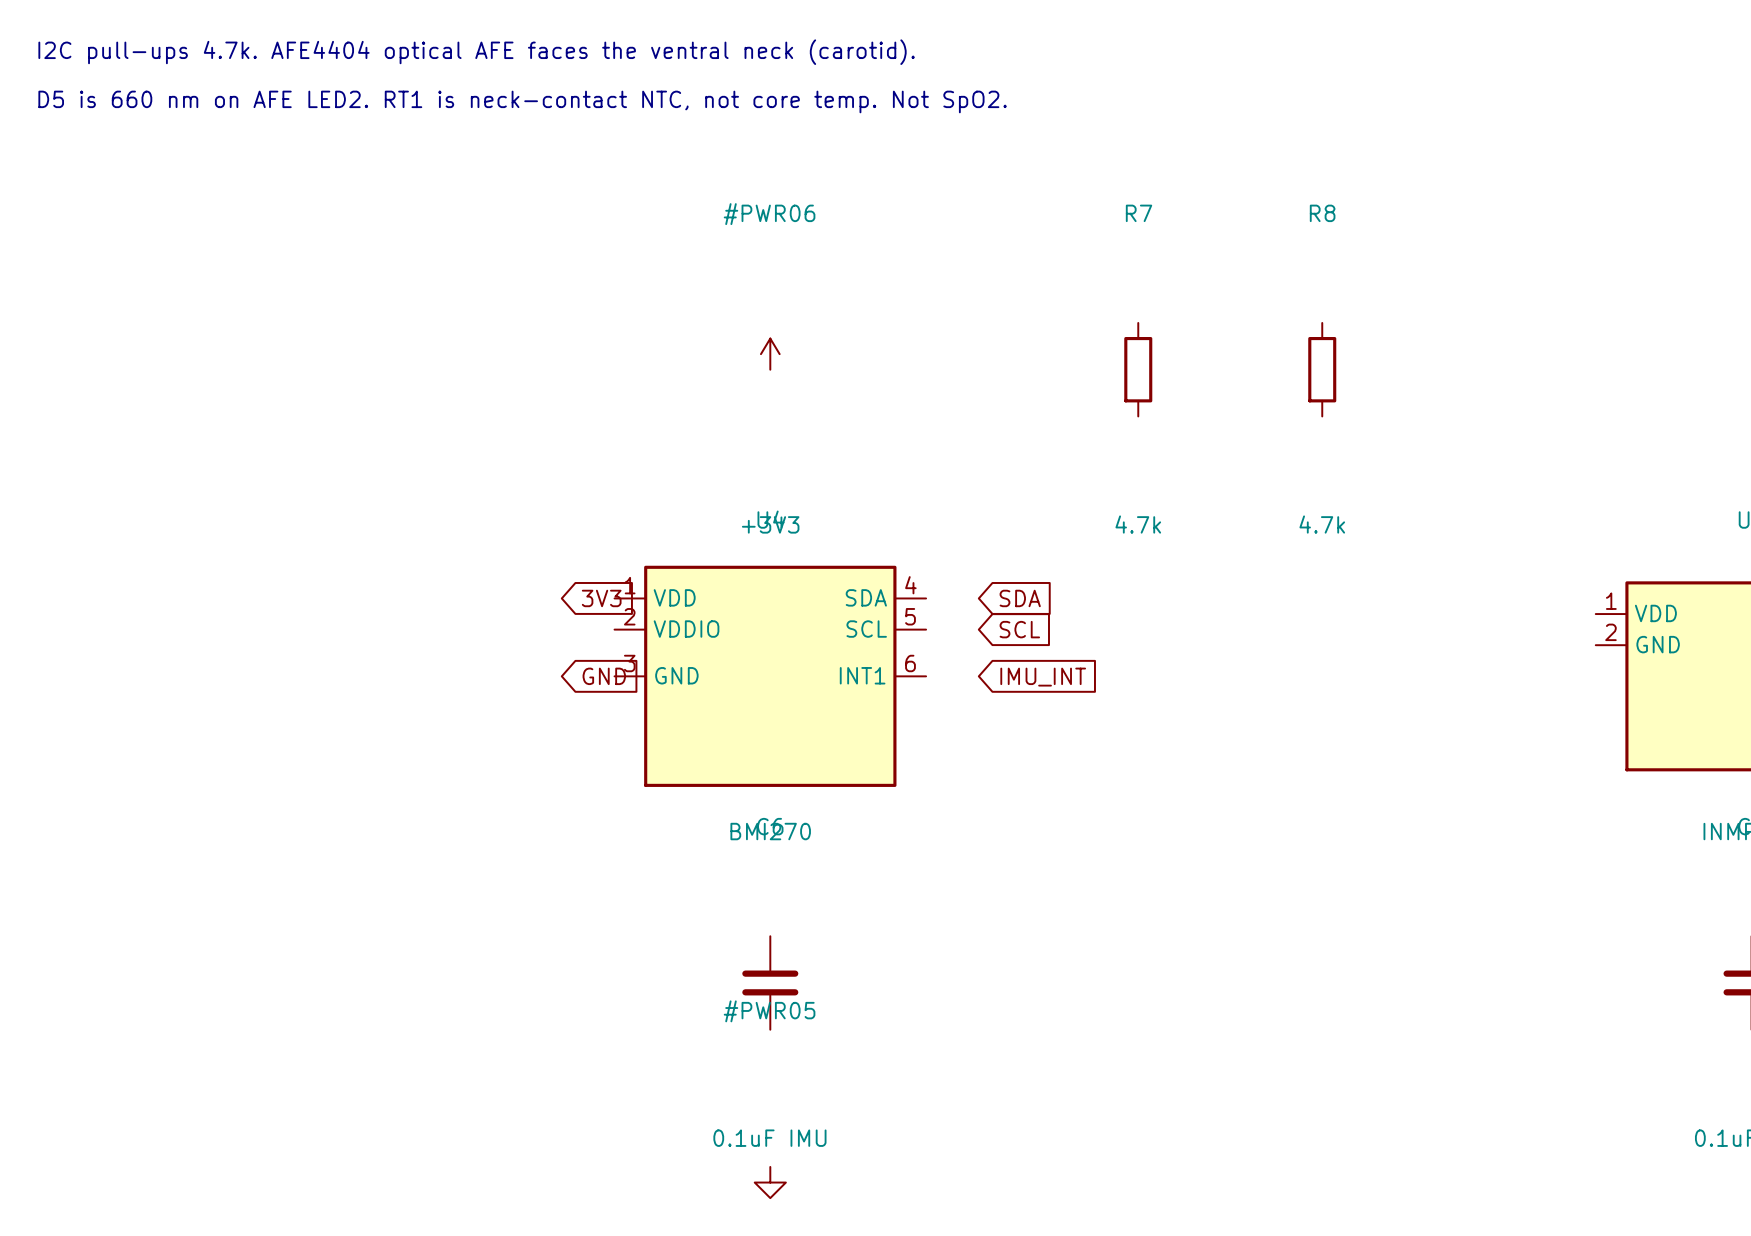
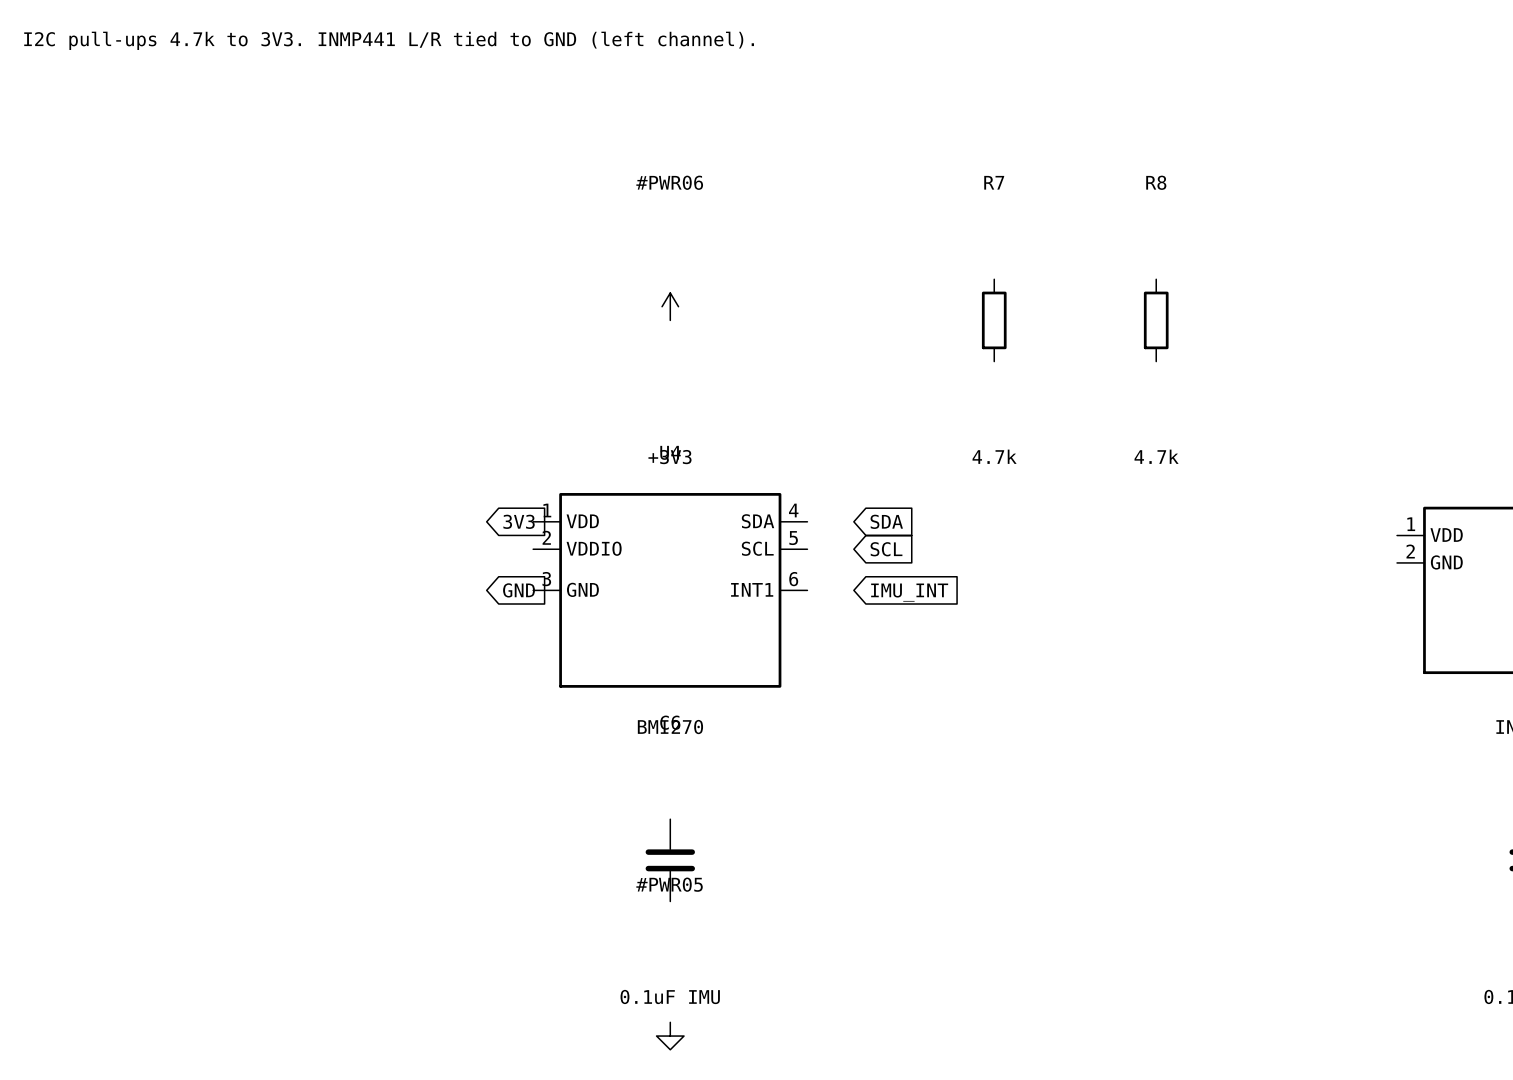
text: I2C pull-ups 4.7k. AFE4404 optical AFE faces the ventral neck (carotid). (476, 52) -> I2C pull-ups 4.7k to 3V3. INMP441 L/R tied to GND (left channel). (389, 40)
text: D5 is 660 nm on AFE LED2. RT1 is neck-contact NTC, not core temp. Not SpO2. (522, 101) -> none

